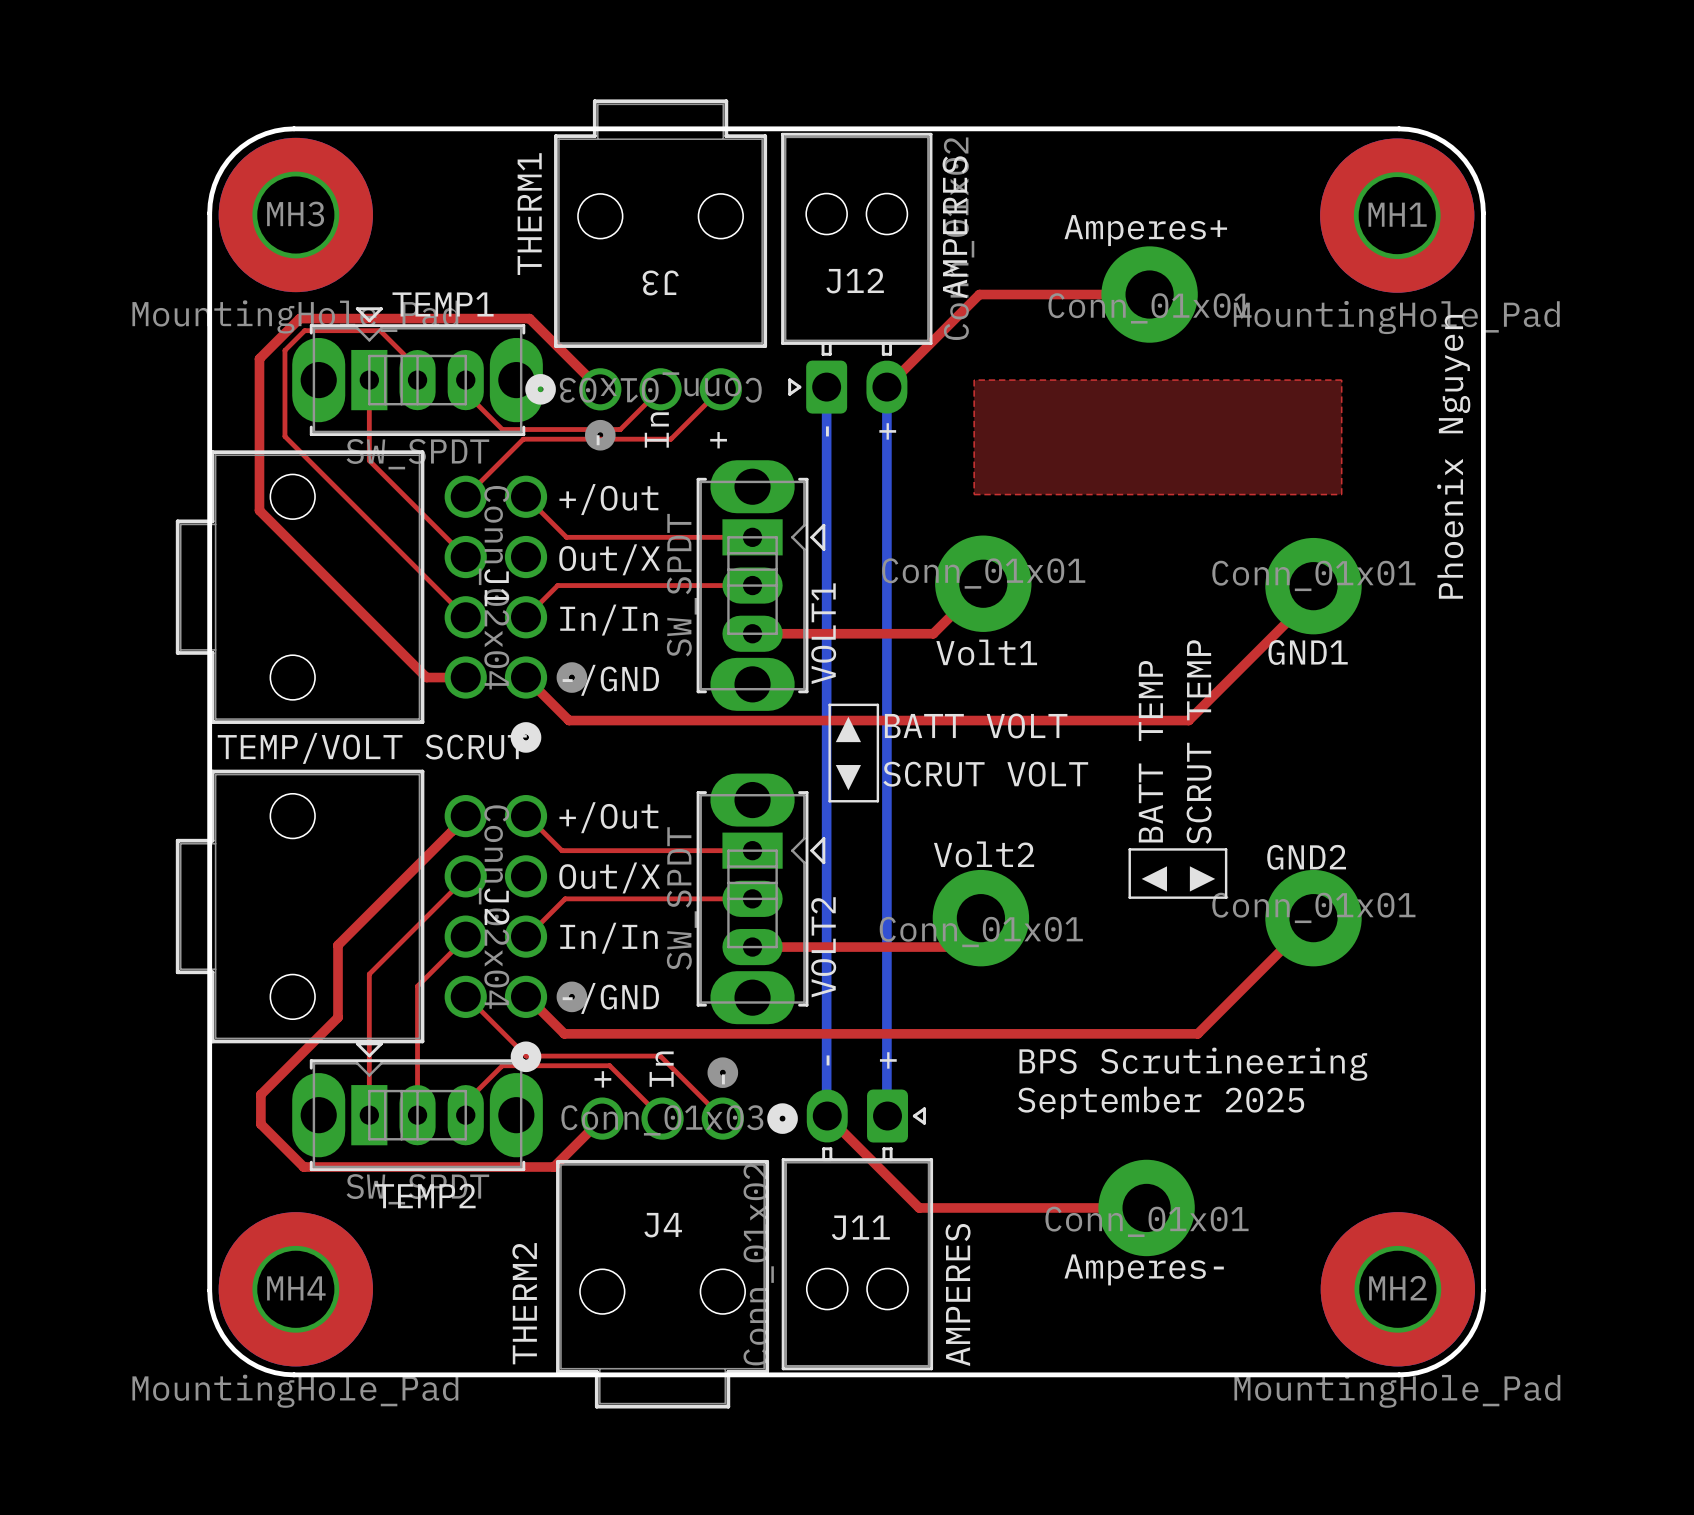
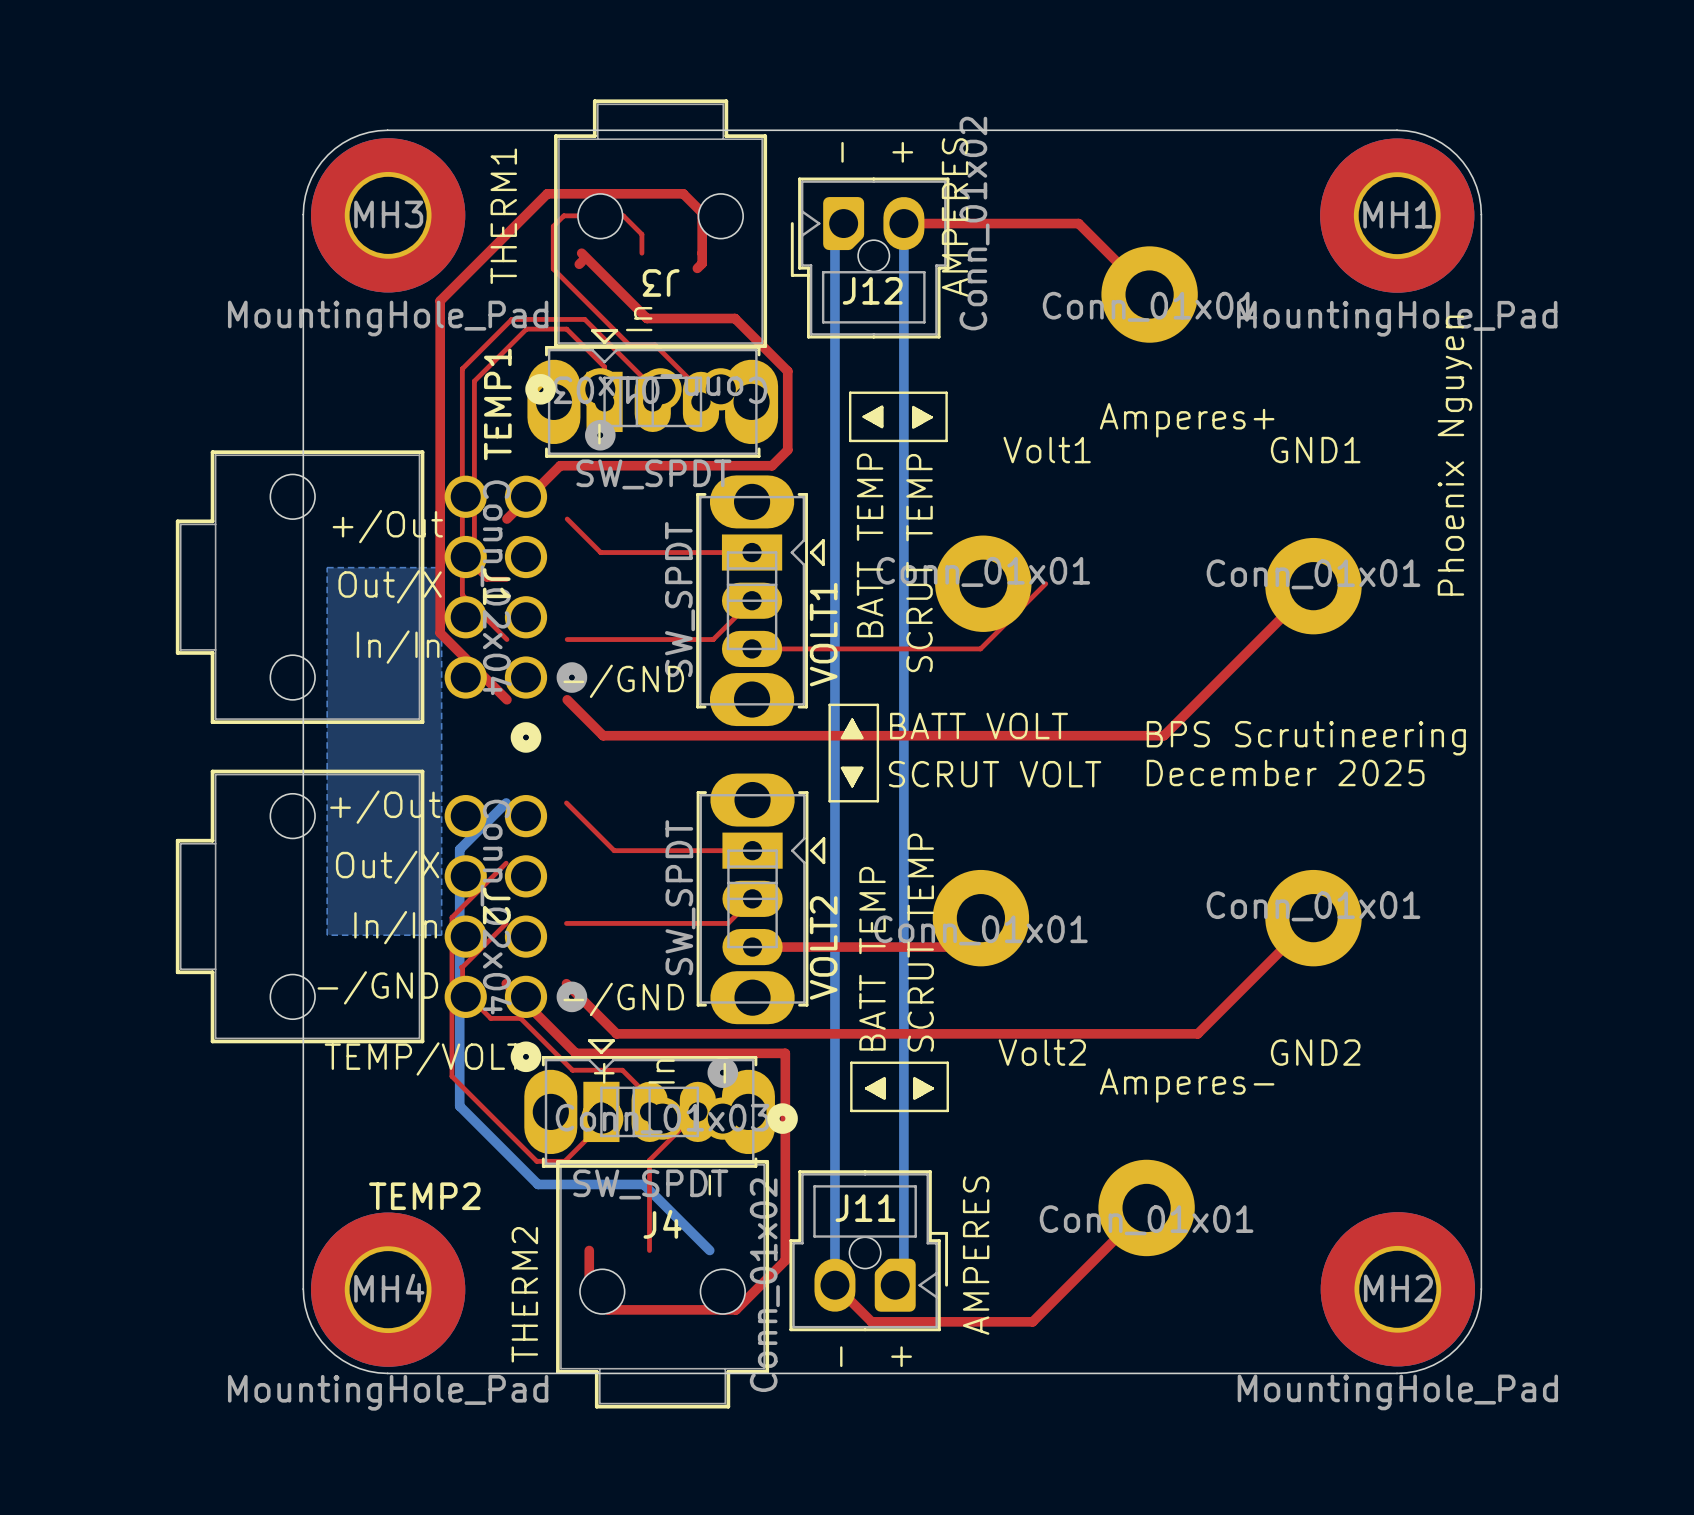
board edge: (294, 128) (1399, 128) (1426, 133) (1443, 141) (1458, 153) (1470, 168) (1478, 185) (1483, 213) (1483, 1290) (1478, 1318) (1470, 1335) (1458, 1350) (1443, 1361) (1426, 1370) (1399, 1374) (294, 1374) (266, 1370) (249, 1361) (234, 1350) (218, 1327) (211, 1309) (209, 1290) (209, 213) (211, 194) (218, 176) (234, 153) (257, 137) (275, 130) (294, 128) -> (387, 130) (359, 135) (342, 143) (328, 154) (316, 169) (308, 186) (303, 214) (303, 1289) (308, 1316) (321, 1341) (335, 1355) (351, 1365) (368, 1371) (387, 1373) (1397, 1373) (1424, 1368) (1449, 1355) (1462, 1341) (1473, 1325) (1479, 1307) (1481, 1289) (1481, 214) (1476, 186) (1462, 162) (1449, 148) (1433, 138) (1415, 132) (1397, 130) (387, 130)
J12 footprint: [781, 132, 933, 414] -> [790, 177, 950, 339]
text: none -> + (902, 152)
MH3 position: (295, 214) -> (388, 215)
text position: THERM1 (529, 214) -> THERM1 (503, 216)
bottom track: none -> (843, 223) (834, 232) (834, 1285)
top track: none -> (903, 223) (1078, 223) (1149, 294) (1180, 294)
bottom track: none -> (903, 223) (903, 1276) (895, 1285)
text position: Amperes+ (1145, 230) -> Amperes+ (1187, 420)
top track: none -> (581, 253) (646, 318) (735, 318) (787, 371) (787, 450) (772, 465) (560, 465) (506, 519)
top track: none -> (641, 253) (641, 234) (623, 215) (563, 215) (553, 226) (553, 268) (629, 344) (654, 344) (700, 390) (700, 401)
top track: none -> (581, 261) (579, 264)
top track: none -> (697, 268) (702, 263) (702, 212) (683, 193) (547, 193) (440, 300) (440, 633) (506, 699)
top track: (1149, 294) (979, 294) (886, 387) -> none
TEMP1 name rotation: 0° (443, 304) -> 90° counterclockwise (497, 404)
TEMP1 position: (417, 371) -> (652, 393)
top track: (369, 380) (369, 460) (465, 557) -> none
top track: (417, 380) (417, 368) (380, 330) (304, 330) (284, 350) (284, 436) (465, 617) -> none
top track: (465, 380) (465, 392) (502, 429) (620, 429) (660, 389) -> none
top zone outline: (974, 380) (974, 494) (1341, 494) (1341, 380) (974, 380) -> none
bottom track: (826, 387) (827, 1116) -> none
bottom track: (886, 387) (887, 1116) -> none
top track: (600, 389) (529, 318) (299, 318) (259, 358) (259, 510) (426, 677) (465, 677) -> none
top track: (720, 389) (670, 439) (523, 439) (465, 496) -> none
line: none -> (850, 392) (946, 392) (946, 440) (850, 440) (850, 392)
top track: none -> (604, 401) (604, 366) (566, 329) (526, 329) (474, 381) (474, 567) (486, 579) (506, 579)
top track: none -> (652, 401) (652, 387) (584, 319) (511, 319) (462, 368) (462, 594) (506, 639)
text position: In (656, 430) -> In (639, 319)
text position: - (827, 431) -> - (842, 152)
text: + (887, 431) -> none
text: + (718, 440) -> none
top track: (525, 496) (566, 537) (752, 537) -> none
text: +/Out (608, 499) -> none
top track: none -> (567, 519) (600, 552) (752, 552)
text: none -> +/Out (387, 526)
text: none -> BATT TEMP ▲ (870, 521)
text: none -> SCRUT TEMP ▼ (919, 538)
text: Out/X (609, 559) -> none
bottom zone outline: none -> (327, 567) (327, 935) (441, 935) (441, 567) (327, 567)
top track: (983, 583) (933, 633) (752, 633) -> none
top track: none -> (1045, 583) (980, 648) (752, 648)
text: none -> Out/X (390, 586)
top track: (752, 585) (557, 585) (525, 617) -> none
VOLT1 position: (760, 585) -> (760, 600)
top track: none -> (1313, 586) (1163, 735) (603, 735) (567, 699)
top track: none -> (752, 600) (713, 639) (567, 639)
top track: (1308, 601) (1188, 720) (569, 720) (525, 677) -> none
text: In/In (608, 620) -> none
text: none -> In/In (398, 647)
text position: Volt1 (986, 652) -> Volt1 (1047, 450)
text position: GND1 (1308, 652) -> GND1 (1315, 450)
text: TEMP/VOLT SCRUT (372, 748) -> none
text position: ▼ SCRUT TEMP (1200, 765) -> ▼ SCRUT TEMP (920, 966)
text: none -> December 2025 (1285, 773)
text position: ▲ BATT TEMP (1152, 776) -> ▲ BATT TEMP (872, 983)
bottom track: none -> (506, 802) (459, 849) (459, 1106) (538, 1184) (643, 1184) (709, 1250)
text: none -> +/Out (385, 807)
top track: (467, 816) (338, 945) (338, 1017) (260, 1094) (260, 1124) (303, 1167) (553, 1167) (602, 1118) -> none
top track: (525, 816) (561, 850) (614, 850) -> (566, 802) (614, 850)
text: +/Out (608, 817) -> none
line: (1129, 849) (1226, 849) (1226, 897) (1129, 897) (1129, 849) -> (851, 1062) (947, 1062) (947, 1110) (851, 1110) (851, 1062)
text position: Volt2 (984, 854) -> Volt2 (1042, 1052)
text position: GND2 (1306, 857) -> GND2 (1315, 1052)
top track: none -> (506, 863) (451, 917) (451, 1076) (536, 1161) (564, 1161) (601, 1124) (601, 1111)
text: none -> Out/X (387, 867)
top track: (467, 876) (369, 974) (369, 1115) -> none
text: Out/X (609, 877) -> none
top track: (752, 898) (565, 898) (525, 936) -> (752, 898) (727, 923) (566, 923)
top track: none -> (506, 923) (461, 967) (462, 990) (490, 1018) (520, 1018) (572, 1070) (622, 1070) (649, 1097) (649, 1111)
text: none -> In/In (395, 927)
top track: (467, 936) (417, 986) (417, 1115) -> none
text: In/In (608, 938) -> none
top track: none -> (506, 983) (575, 1053) (785, 1053) (785, 1260) (736, 1309) (608, 1309) (589, 1290) (589, 1250)
text: none -> -/GND (377, 987)
top track: (465, 996) (526, 1056) (660, 1056) (722, 1118) -> none
top track: (525, 996) (564, 1033) (616, 1033) -> (566, 983) (616, 1033)
text: none -> TEMP/VOLT (424, 1058)
text: - (828, 1060) -> none
text position: + (888, 1060) -> + (901, 1356)
text position: BPS Scrutineering (1193, 1064) -> BPS Scrutineering (1306, 738)
J11 footprint: [781, 1089, 934, 1371] -> [789, 1170, 949, 1332]
text: September 2025 (1161, 1102) -> none
TEMP2 position: (417, 1106) -> (649, 1103)
top track: none -> (697, 1111) (649, 1160) (649, 1250)
top track: (465, 1115) (465, 1102) (502, 1065) (609, 1065) (662, 1118) -> none
top track: (827, 1116) (919, 1207) (1146, 1207) -> none
text: none -> - (709, 1185)
top track: none -> (1177, 1207) (1146, 1207) (1032, 1321) (871, 1321) (834, 1285)
text position: Amperes- (1144, 1269) -> Amperes- (1187, 1085)
MH4 position: (295, 1289) -> (388, 1289)
text position: AMPERES (958, 1294) -> AMPERES (976, 1255)
text: none -> - (841, 1356)

